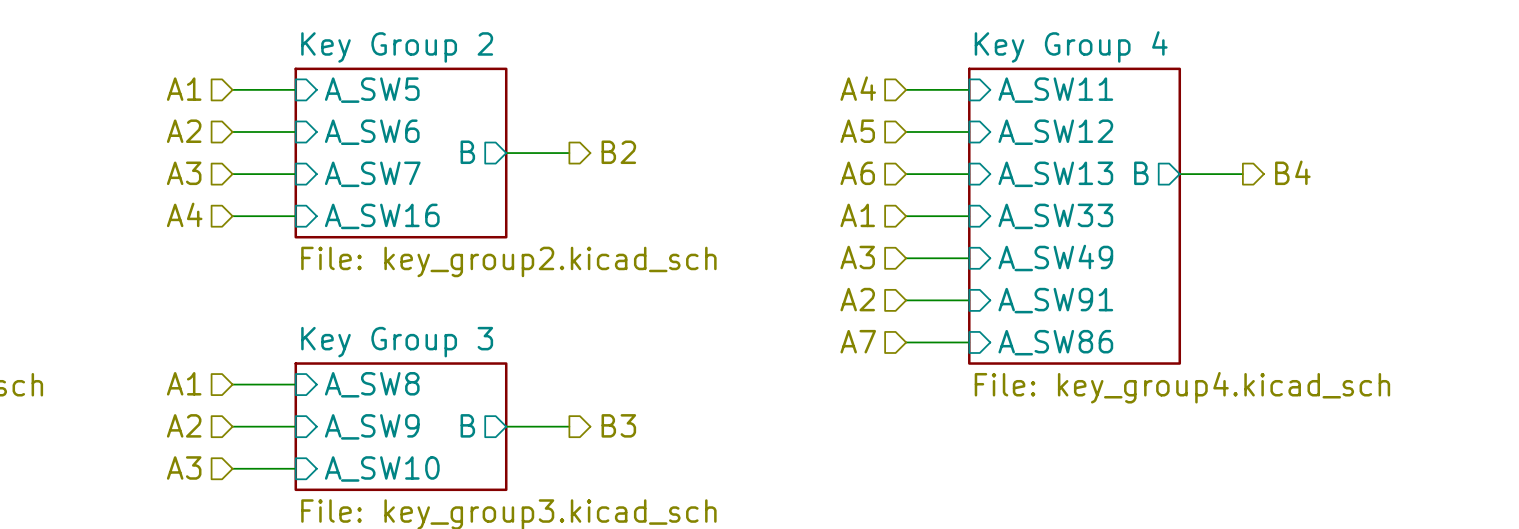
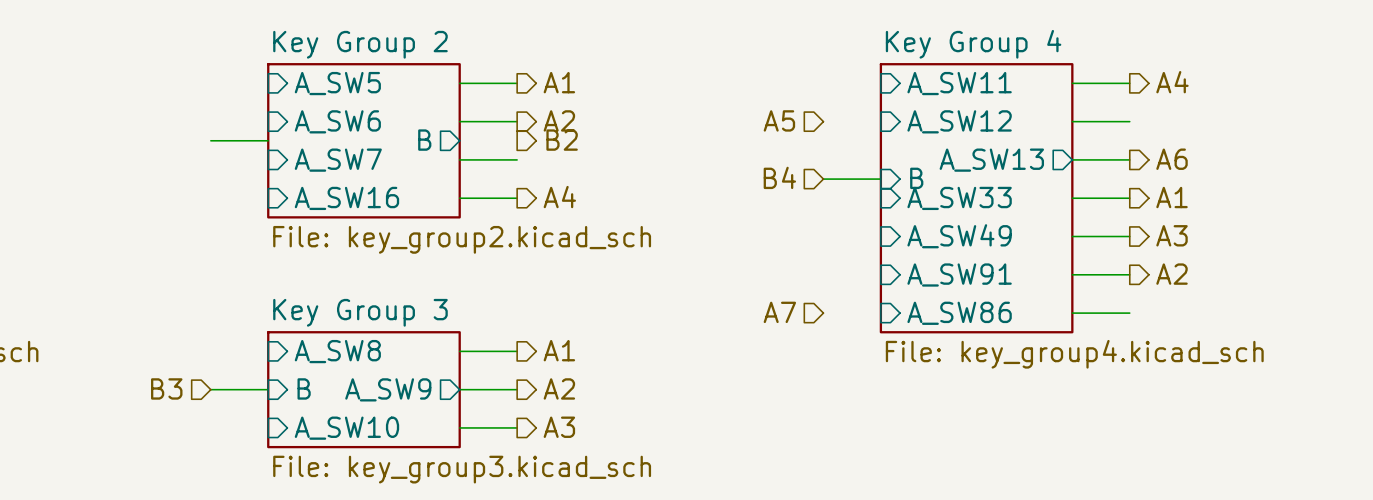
hierarchical label: A4 (858, 88) -> none
hierarchical label: none -> A4 (1172, 82)
hierarchical label: A1 (184, 89) -> none
wire: (232, 89) (295, 89) -> (459, 83) (517, 83)
hierarchical label: none -> A1 (559, 82)
wire: (906, 89) (969, 89) -> (1072, 83) (1129, 83)
hierarchical label: A2 (184, 131) -> none
hierarchical label: none -> A2 (559, 120)
wire: (232, 132) (295, 132) -> (459, 121) (517, 121)
wire: (906, 132) (969, 132) -> (1072, 121) (1129, 121)
wire: (506, 153) (569, 153) -> (210, 140) (268, 140)
hierarchical label: B4 (1292, 172) -> A6 (1172, 159)
hierarchical label: A3 (184, 173) -> none
hierarchical label: A6 (857, 173) -> none
sheet pin: B (1141, 173) -> A_SW13 (991, 160)
wire: (232, 174) (295, 174) -> (459, 159) (517, 159)
wire: (906, 174) (969, 174) -> (823, 179) (880, 179)
sheet pin: A_SW13 (1055, 174) -> none
hierarchical label: none -> B4 (779, 177)
sheet pin: none -> B (916, 178)
hierarchical label: A4 (184, 214) -> none
hierarchical label: none -> A4 (559, 197)
hierarchical label: A1 (857, 215) -> none
hierarchical label: none -> A1 (1172, 197)
wire: (232, 216) (295, 216) -> (459, 198) (517, 198)
wire: (906, 216) (969, 216) -> (1072, 198) (1129, 198)
hierarchical label: A3 (857, 257) -> none
hierarchical label: none -> A3 (1172, 235)
wire: (906, 258) (969, 258) -> (1072, 236) (1129, 236)
hierarchical label: A2 (857, 299) -> none
hierarchical label: none -> A2 (1172, 274)
wire: (906, 300) (969, 300) -> (1072, 274) (1129, 274)
wire: (906, 342) (969, 342) -> (1072, 313) (1129, 313)
hierarchical label: A1 (184, 383) -> none
hierarchical label: none -> A1 (559, 350)
wire: (232, 384) (295, 384) -> (459, 351) (517, 351)
hierarchical label: A2 (184, 425) -> B3 (166, 388)
sheet pin: B (467, 425) -> A_SW9 (388, 389)
hierarchical label: B3 (618, 425) -> A2 (559, 388)
sheet pin: A_SW9 (372, 426) -> B (304, 388)
hierarchical label: A3 (184, 467) -> none
hierarchical label: none -> A3 (559, 427)
wire: (232, 468) (295, 468) -> (459, 427) (517, 427)

